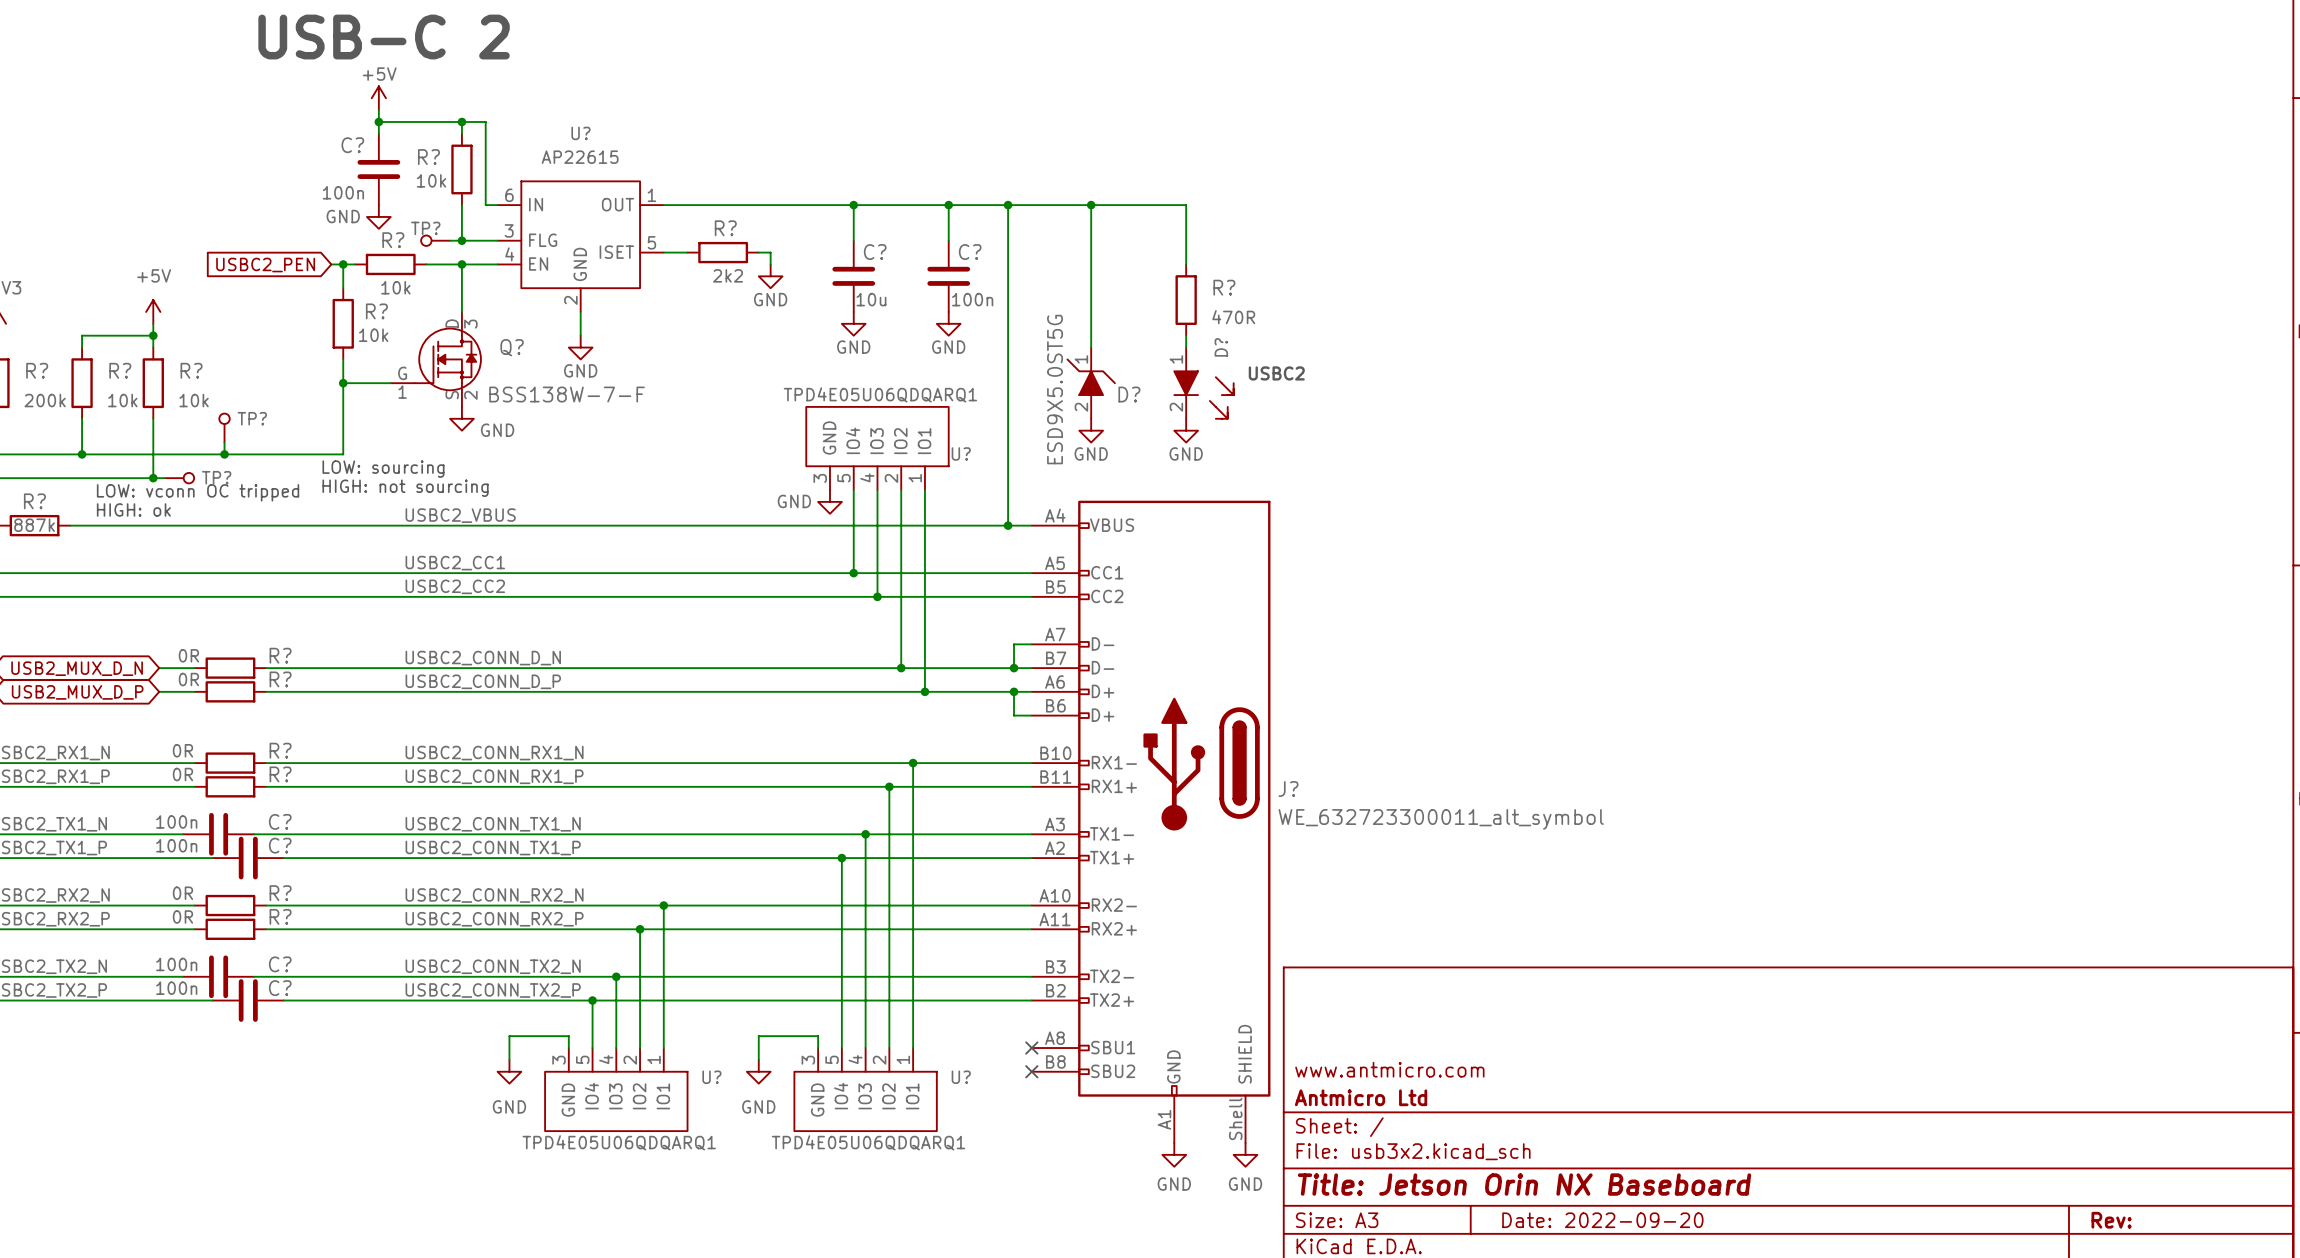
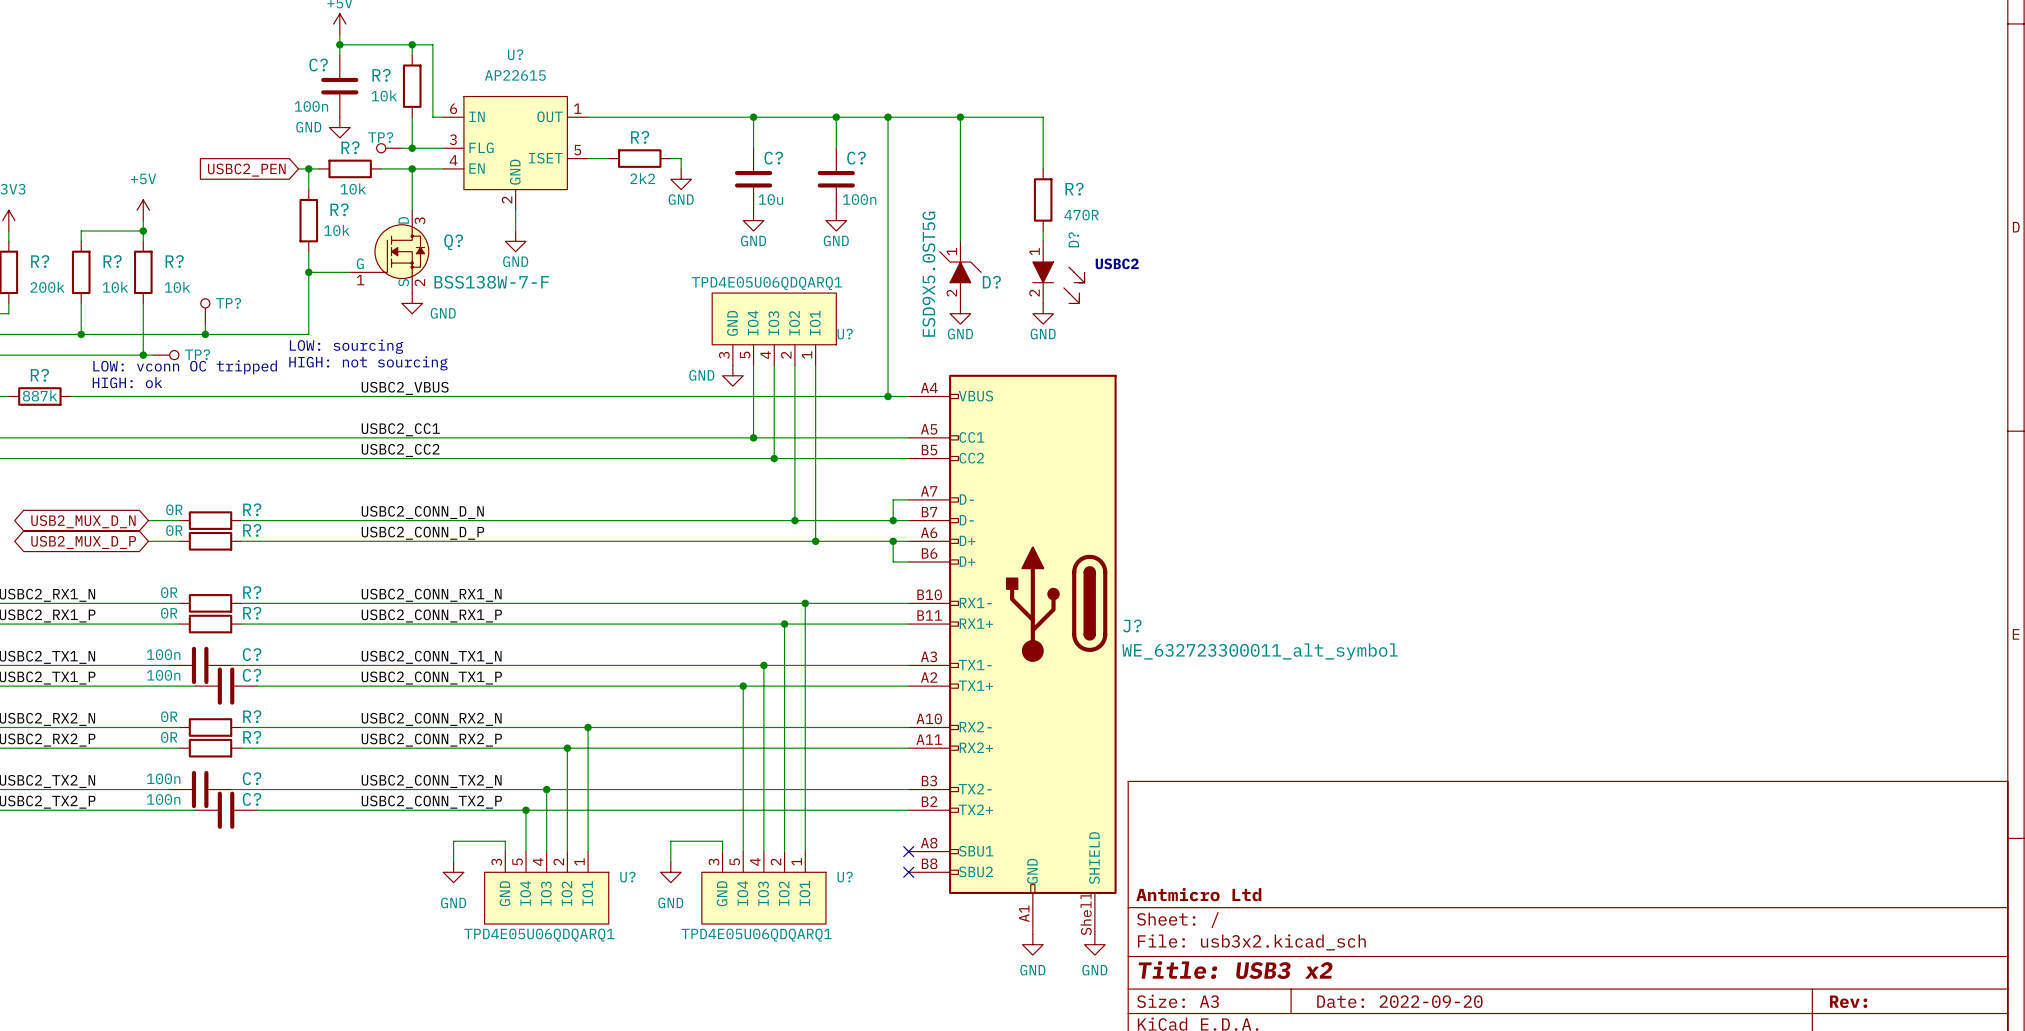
title block: www.antmicro.com (1389, 1069) -> none
title block: Title: Jetson Orin NX Baseboard (1524, 1184) -> Title: USB3 x2 (1235, 970)

